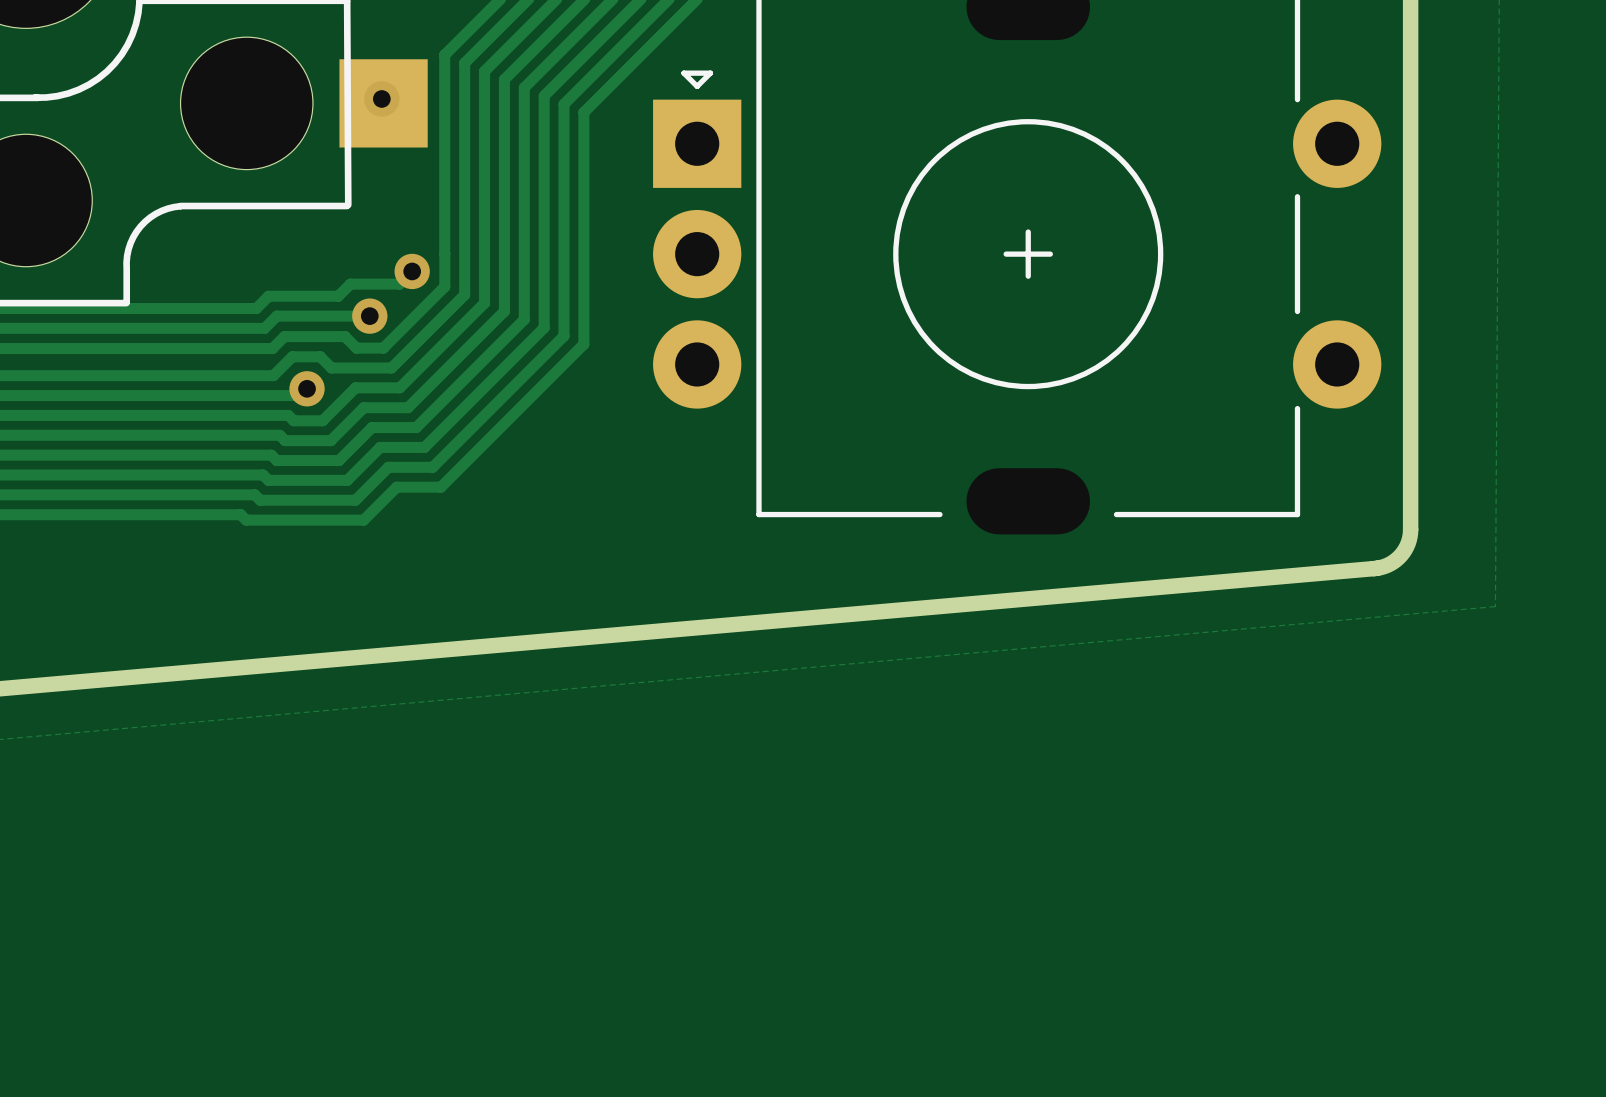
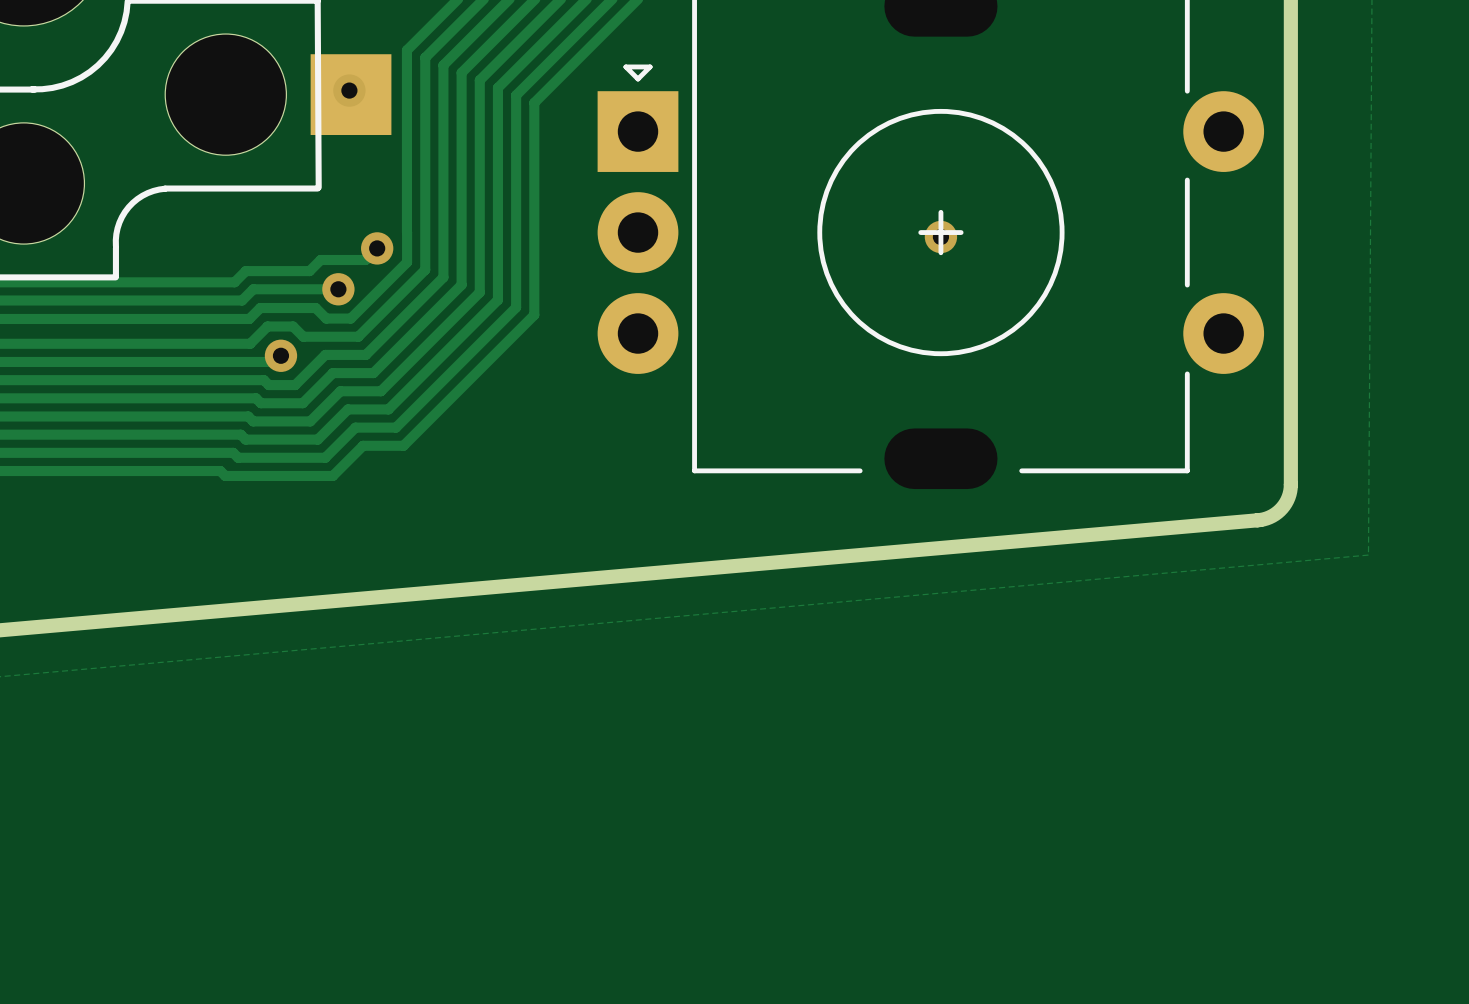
via: none -> (940, 236)

